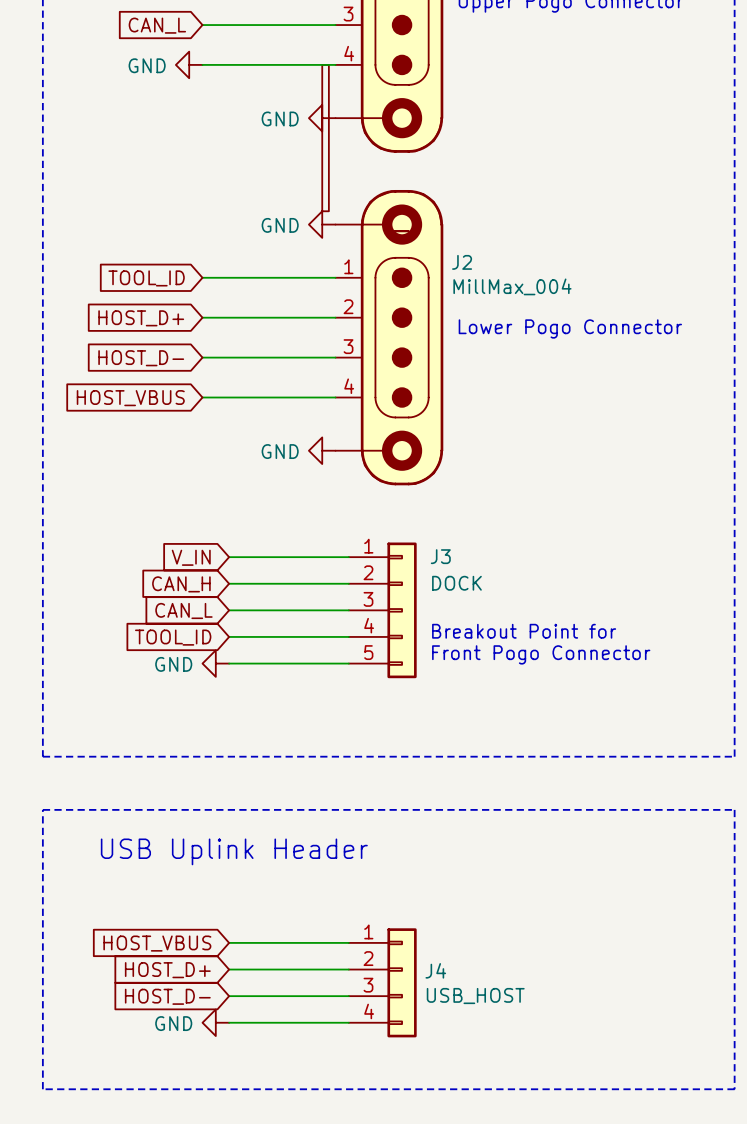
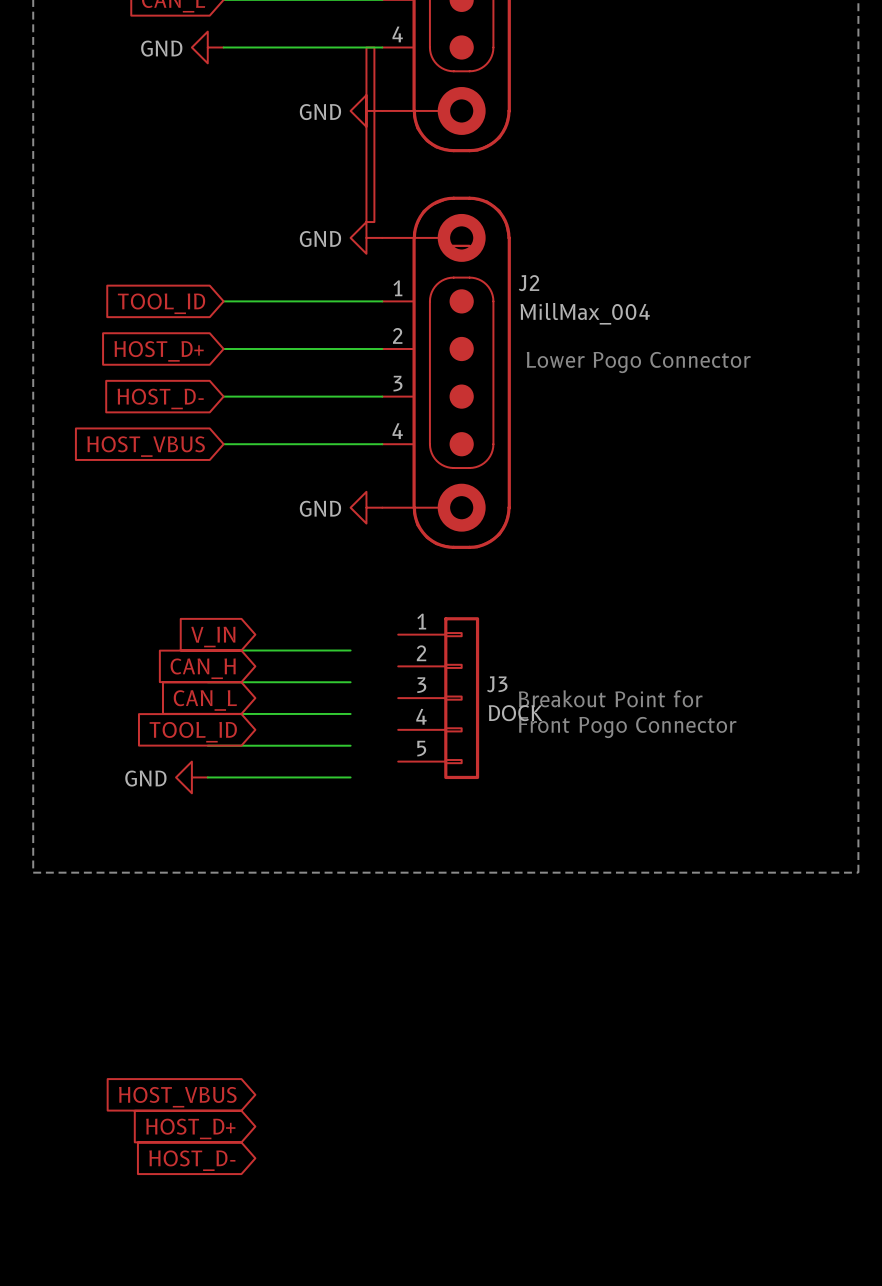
J3 name position: J3 (440, 556) -> J3 (497, 684)
wire: (229, 557) (348, 557) -> (207, 650) (350, 650)
wire: (229, 583) (348, 583) -> (207, 682) (350, 682)
J3 value position: DOCK (456, 583) -> DOCK (515, 713)
wire: (229, 610) (348, 610) -> (207, 713) (350, 713)
text position: Breakout Point for (524, 631) -> Breakout Point for (610, 698)
wire: (229, 636) (348, 636) -> (207, 745) (350, 745)
text position: Front Pogo Connector (541, 654) -> Front Pogo Connector (627, 727)
power symbol position: GND (215, 663) -> GND (191, 777)
wire: (229, 663) (348, 663) -> (207, 777) (350, 777)
line: (42, 809) (734, 809) (734, 1089) (42, 1089) (42, 809) -> none
text: USB Uplink Header (234, 851) -> none
wire: (229, 942) (348, 942) -> none
wire: (229, 969) (348, 969) -> none
J4: USB_HOST (382, 982) -> none
wire: (229, 996) (348, 996) -> none
power symbol: GND (215, 1022) -> none
wire: (229, 1022) (348, 1022) -> none

